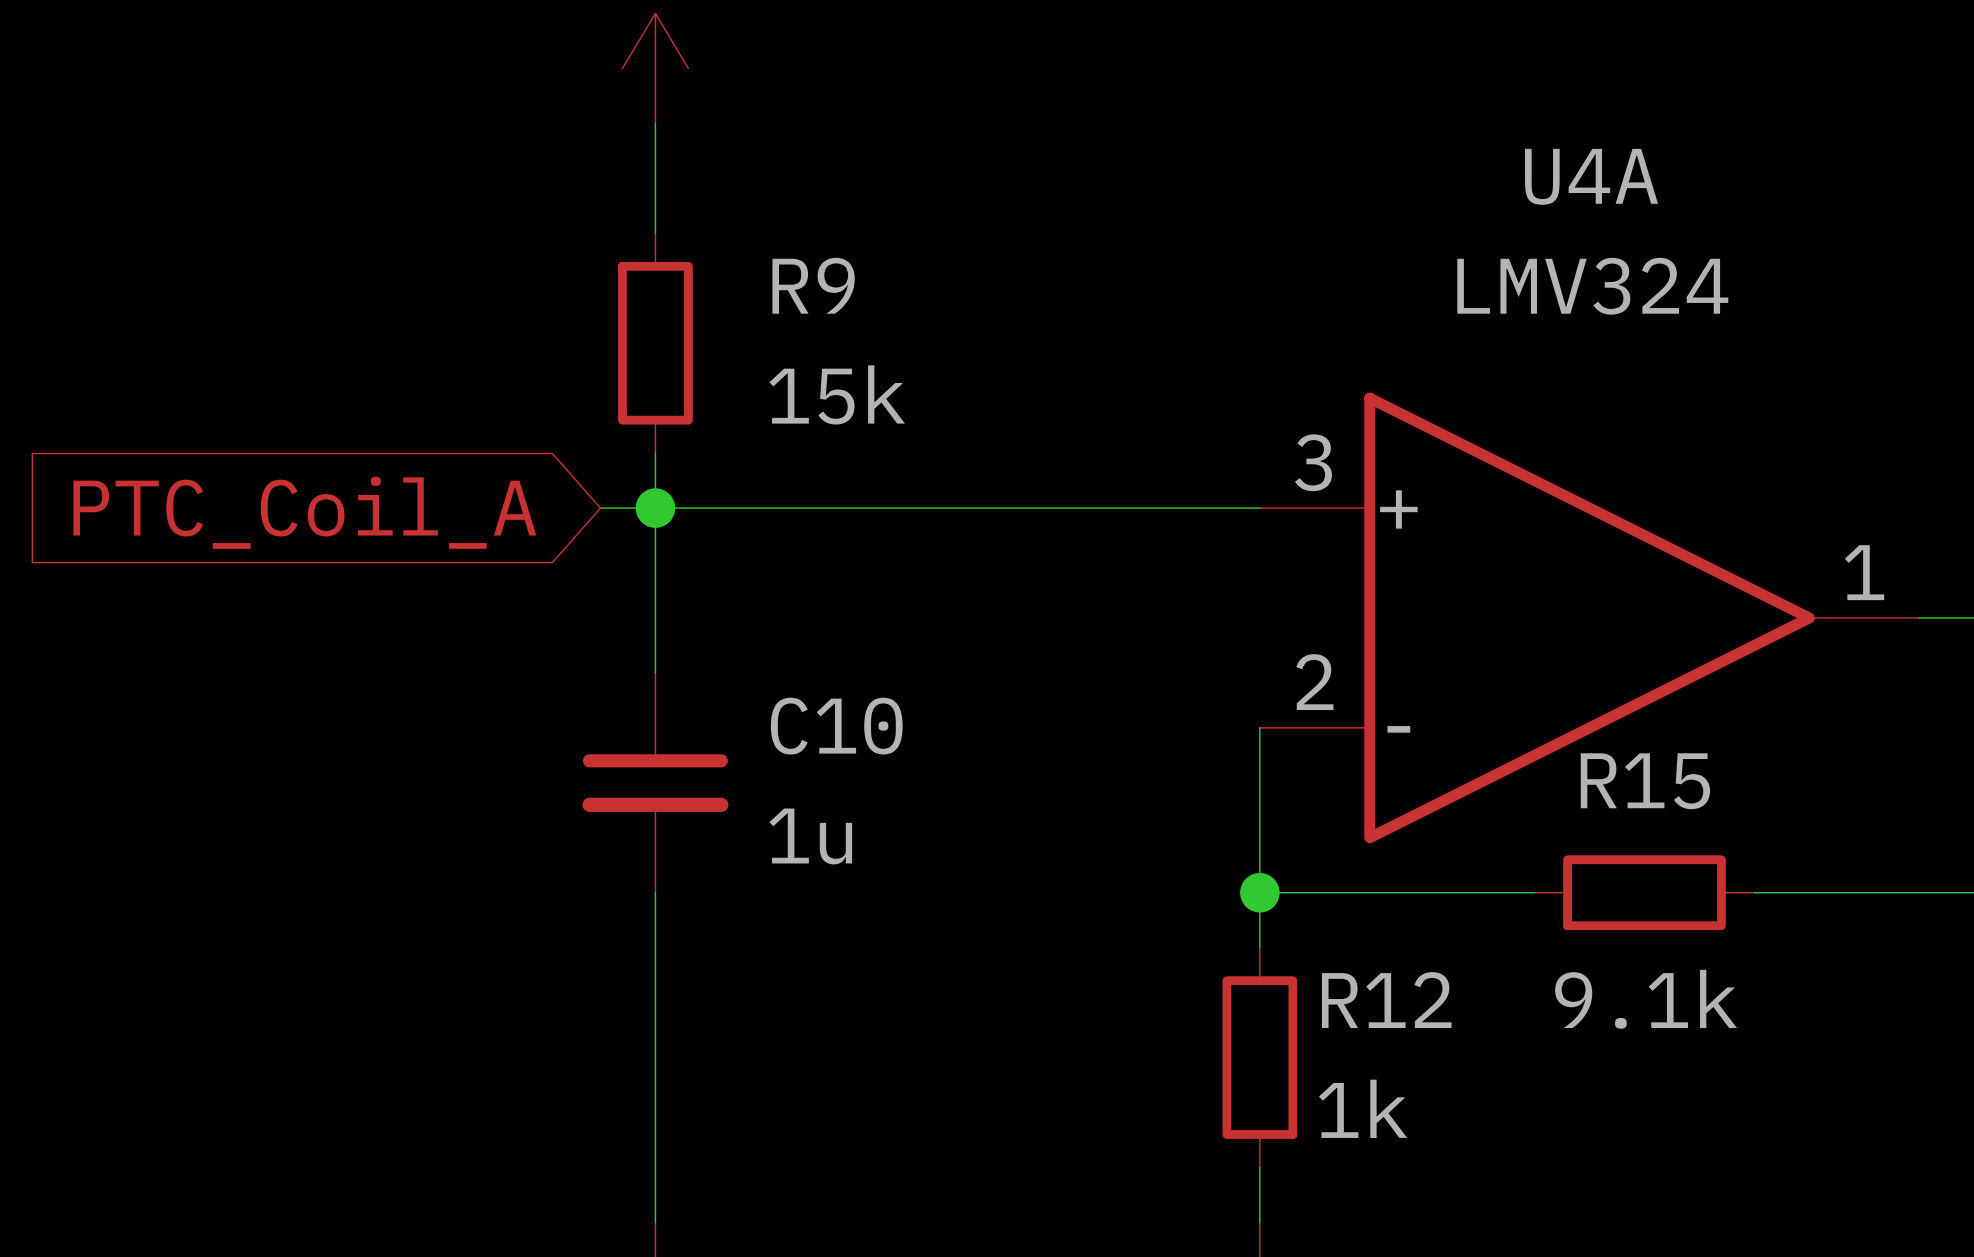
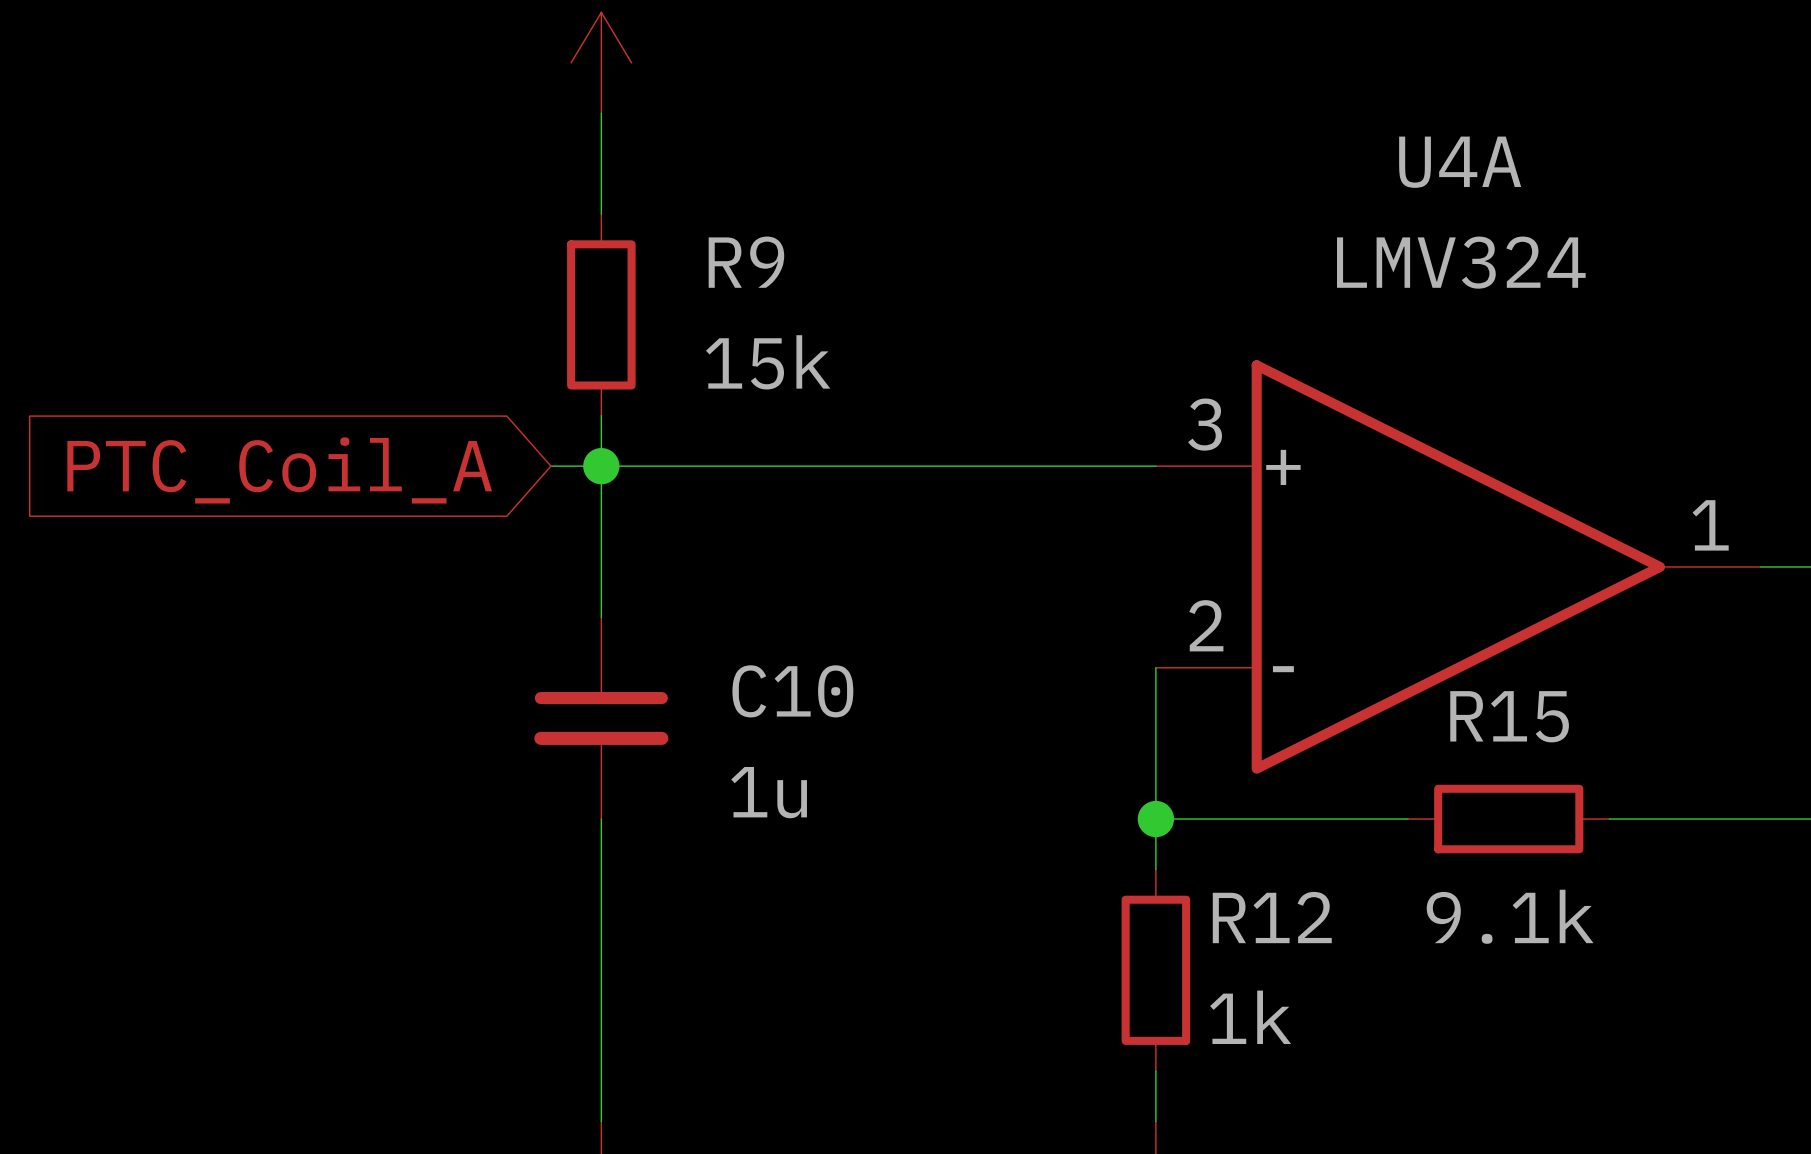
C10 name position: C10 (836, 726) -> C10 (792, 691)
C10 value position: 1u (810, 836) -> 1u (769, 792)

